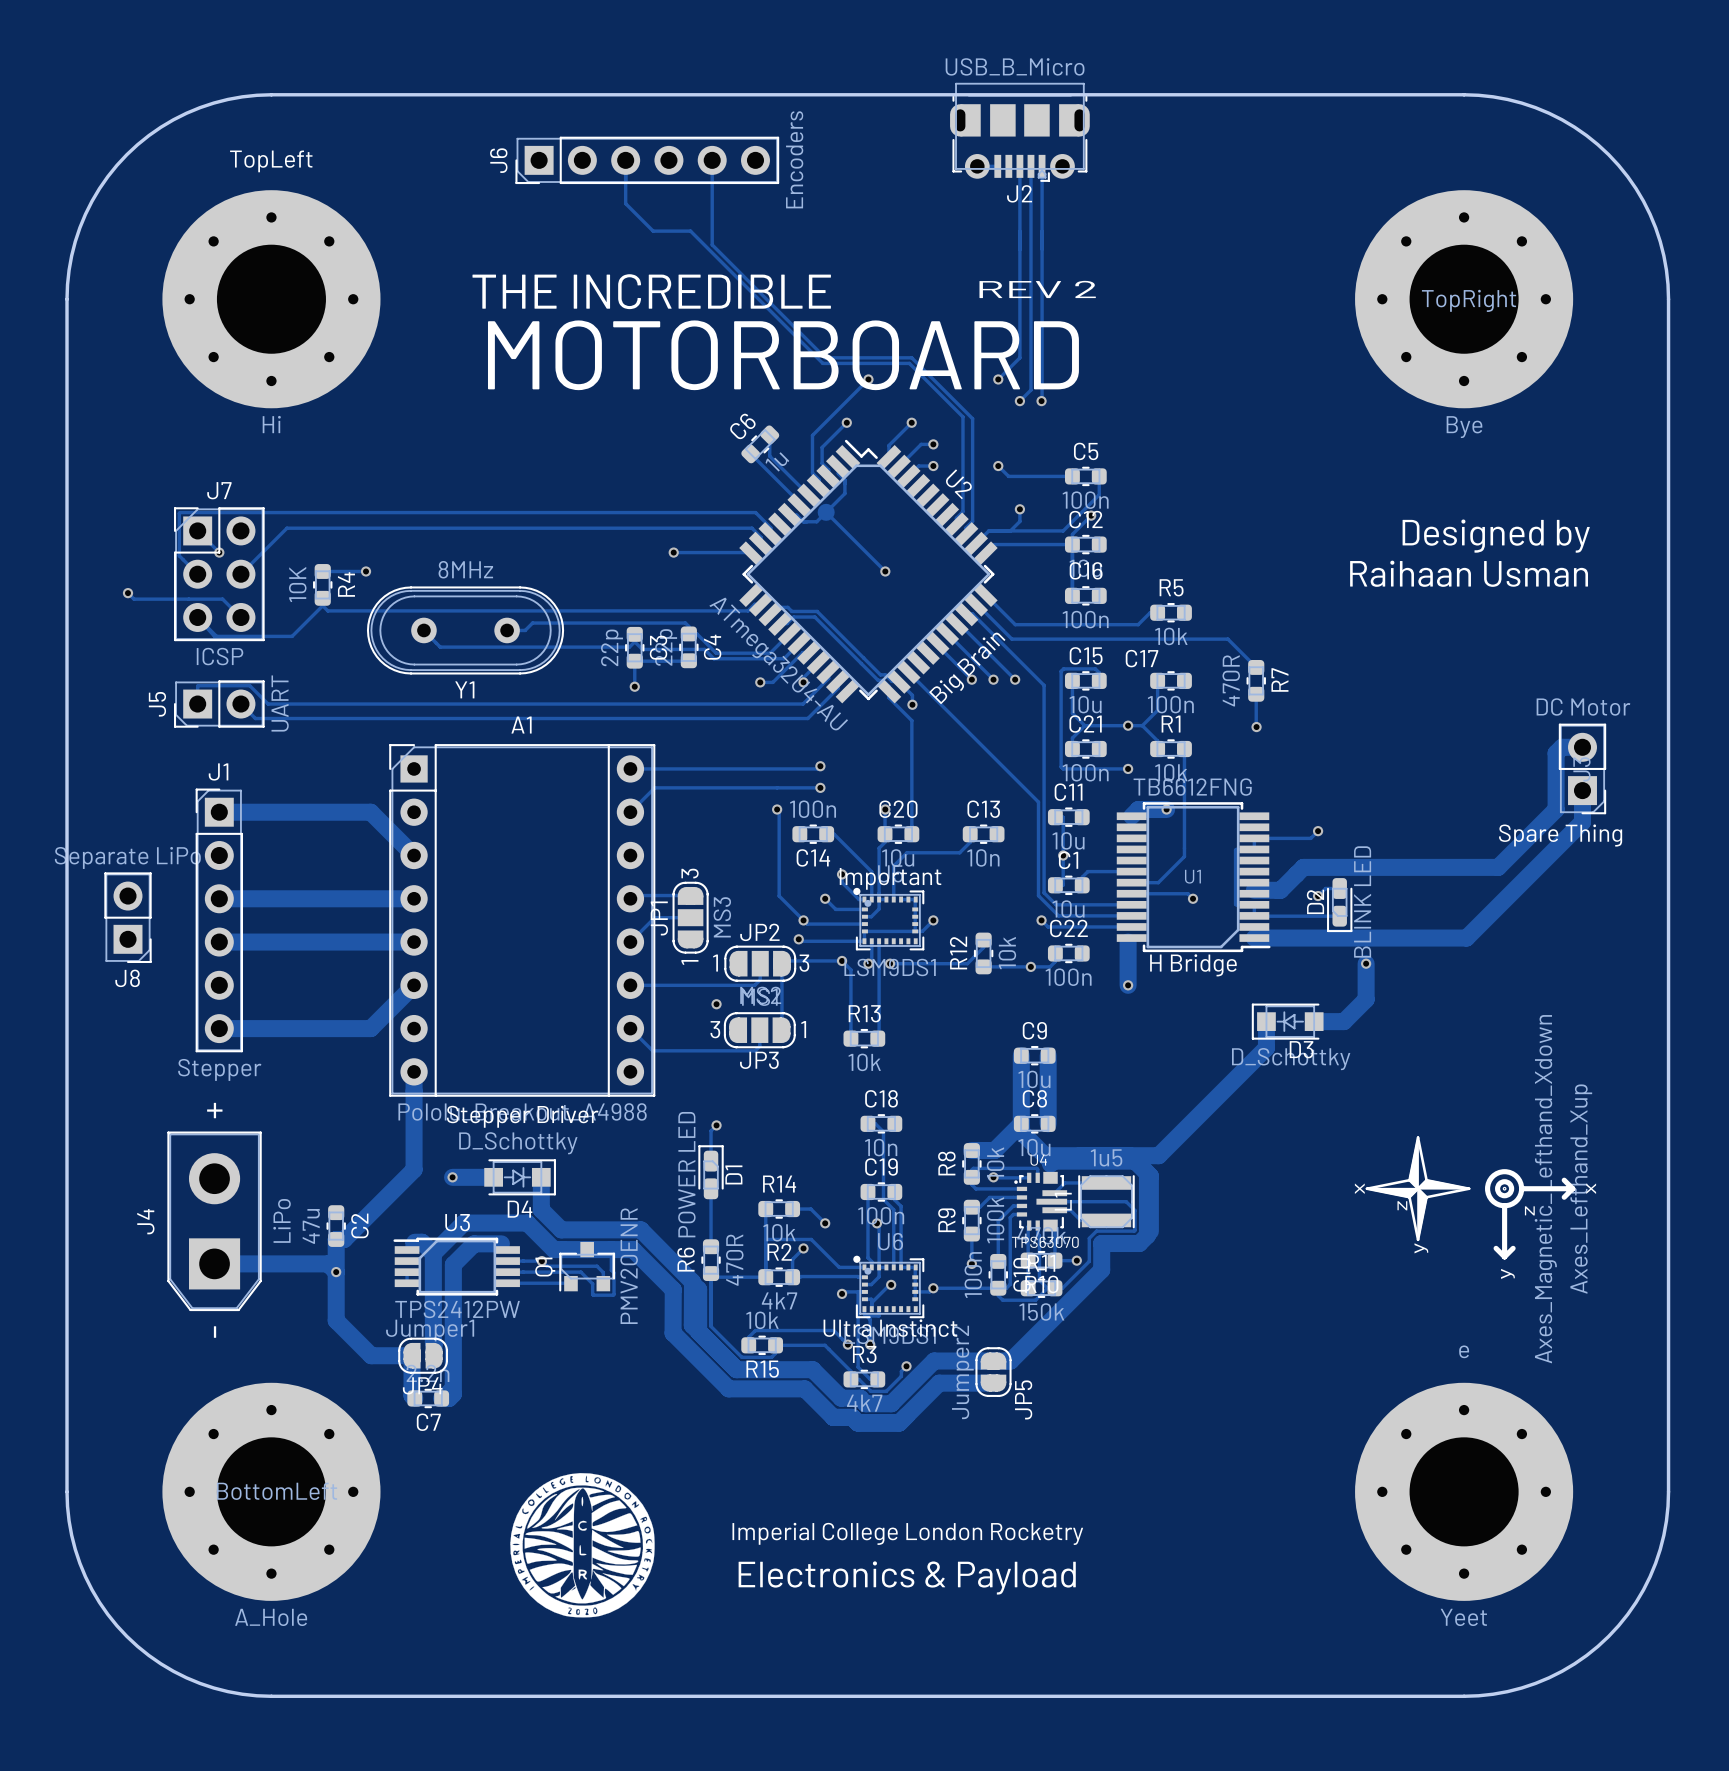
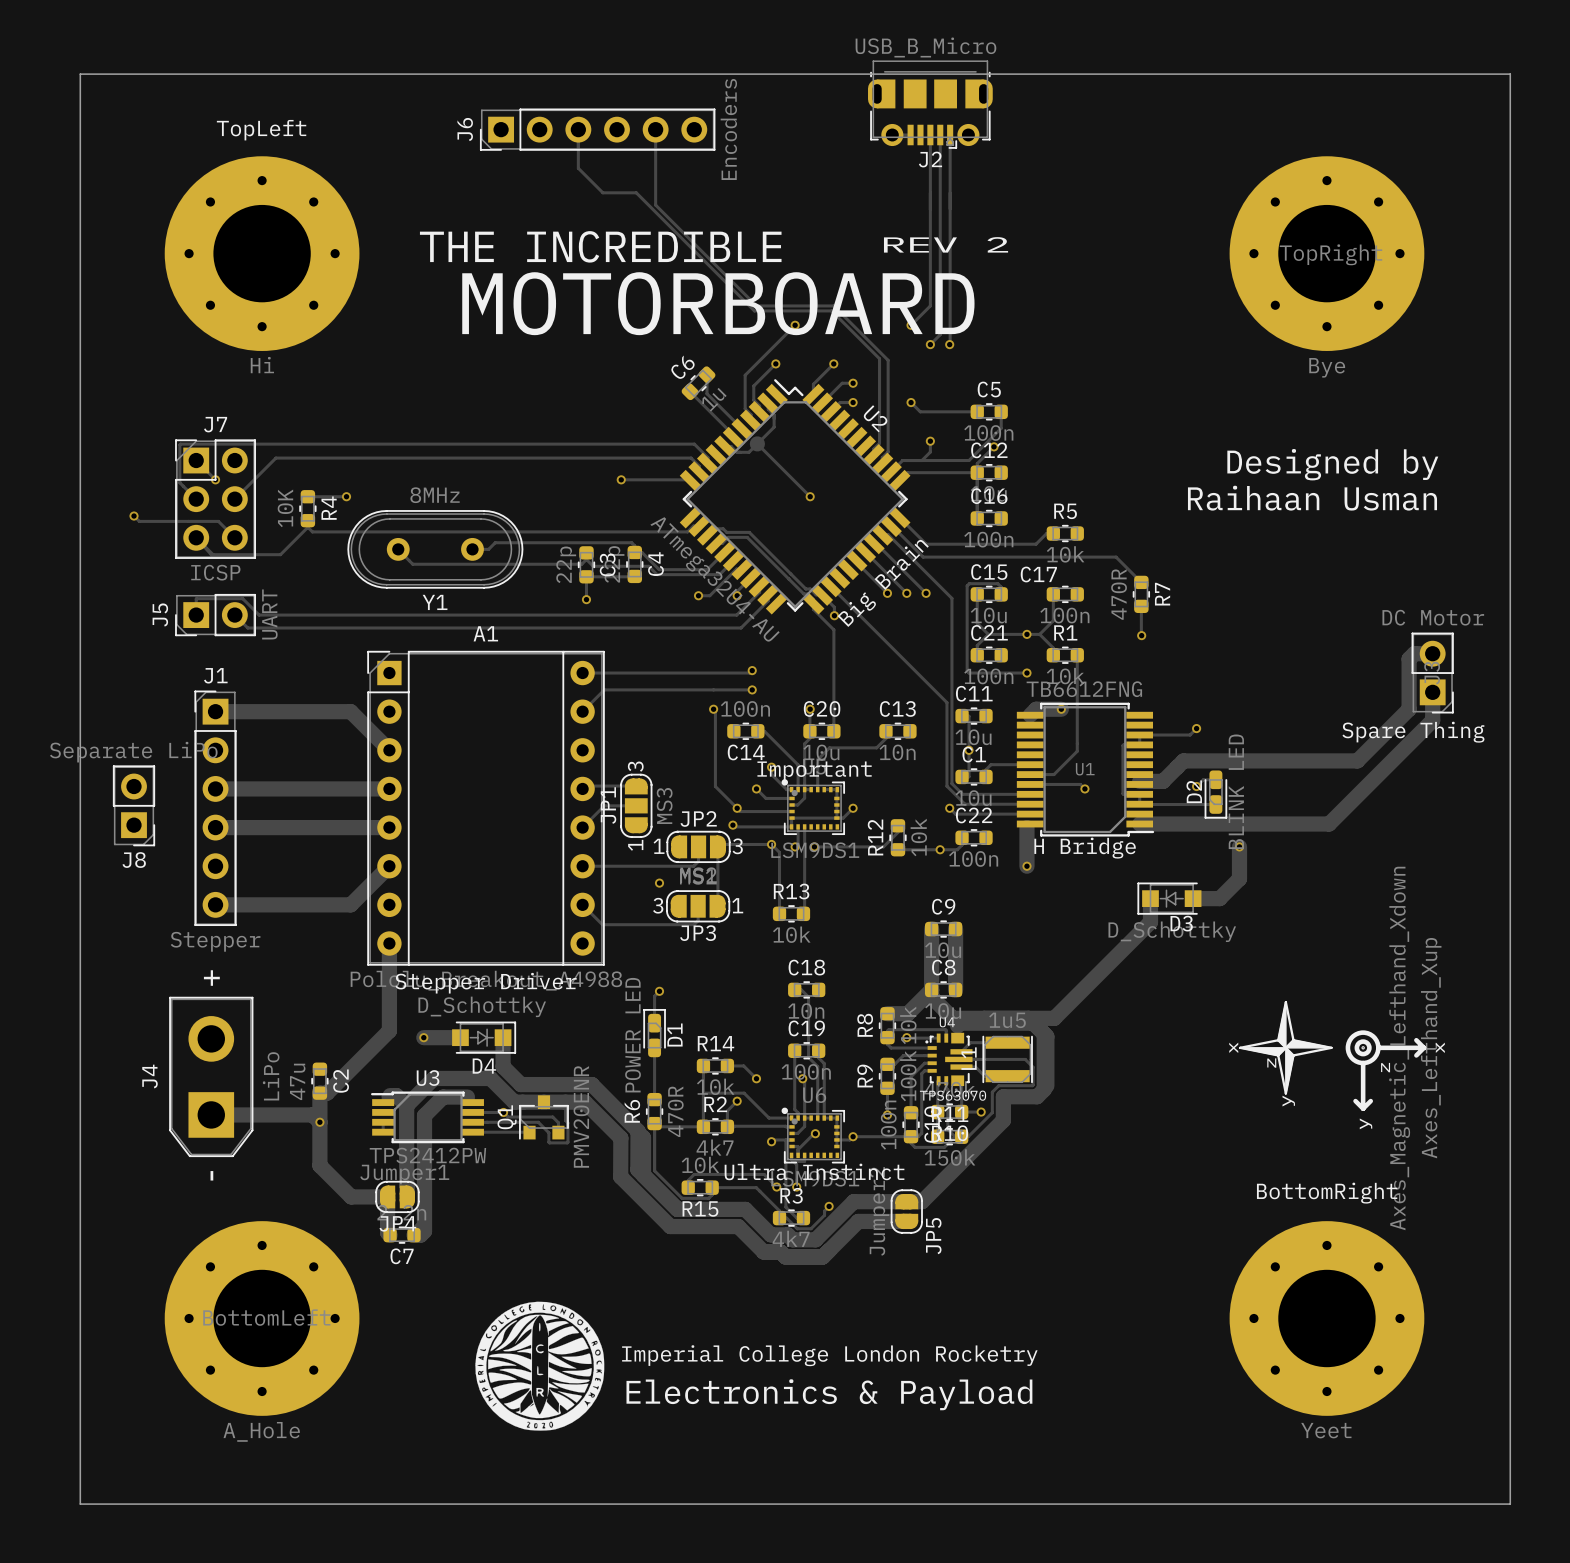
board edge: (271, 94) (1478, 95) (1507, 99) (1549, 113) (1586, 135) (1618, 165) (1636, 188) (1650, 214) (1663, 255) (1668, 284) (1668, 1491) (1663, 1535) (1650, 1576) (1627, 1614) (1597, 1646) (1574, 1663) (1549, 1677) (1507, 1691) (1478, 1695) (271, 1696) (228, 1691) (186, 1677) (148, 1655) (116, 1625) (99, 1602) (85, 1576) (71, 1535) (67, 1506) (67, 284) (75, 241) (92, 201) (116, 165) (137, 144) (160, 127) (200, 107) (242, 96) (271, 94) -> (80, 74) (80, 1504) (1510, 1504) (1510, 74) (80, 74)
e name: e (1464, 1351) -> BottomRight (1327, 1193)

